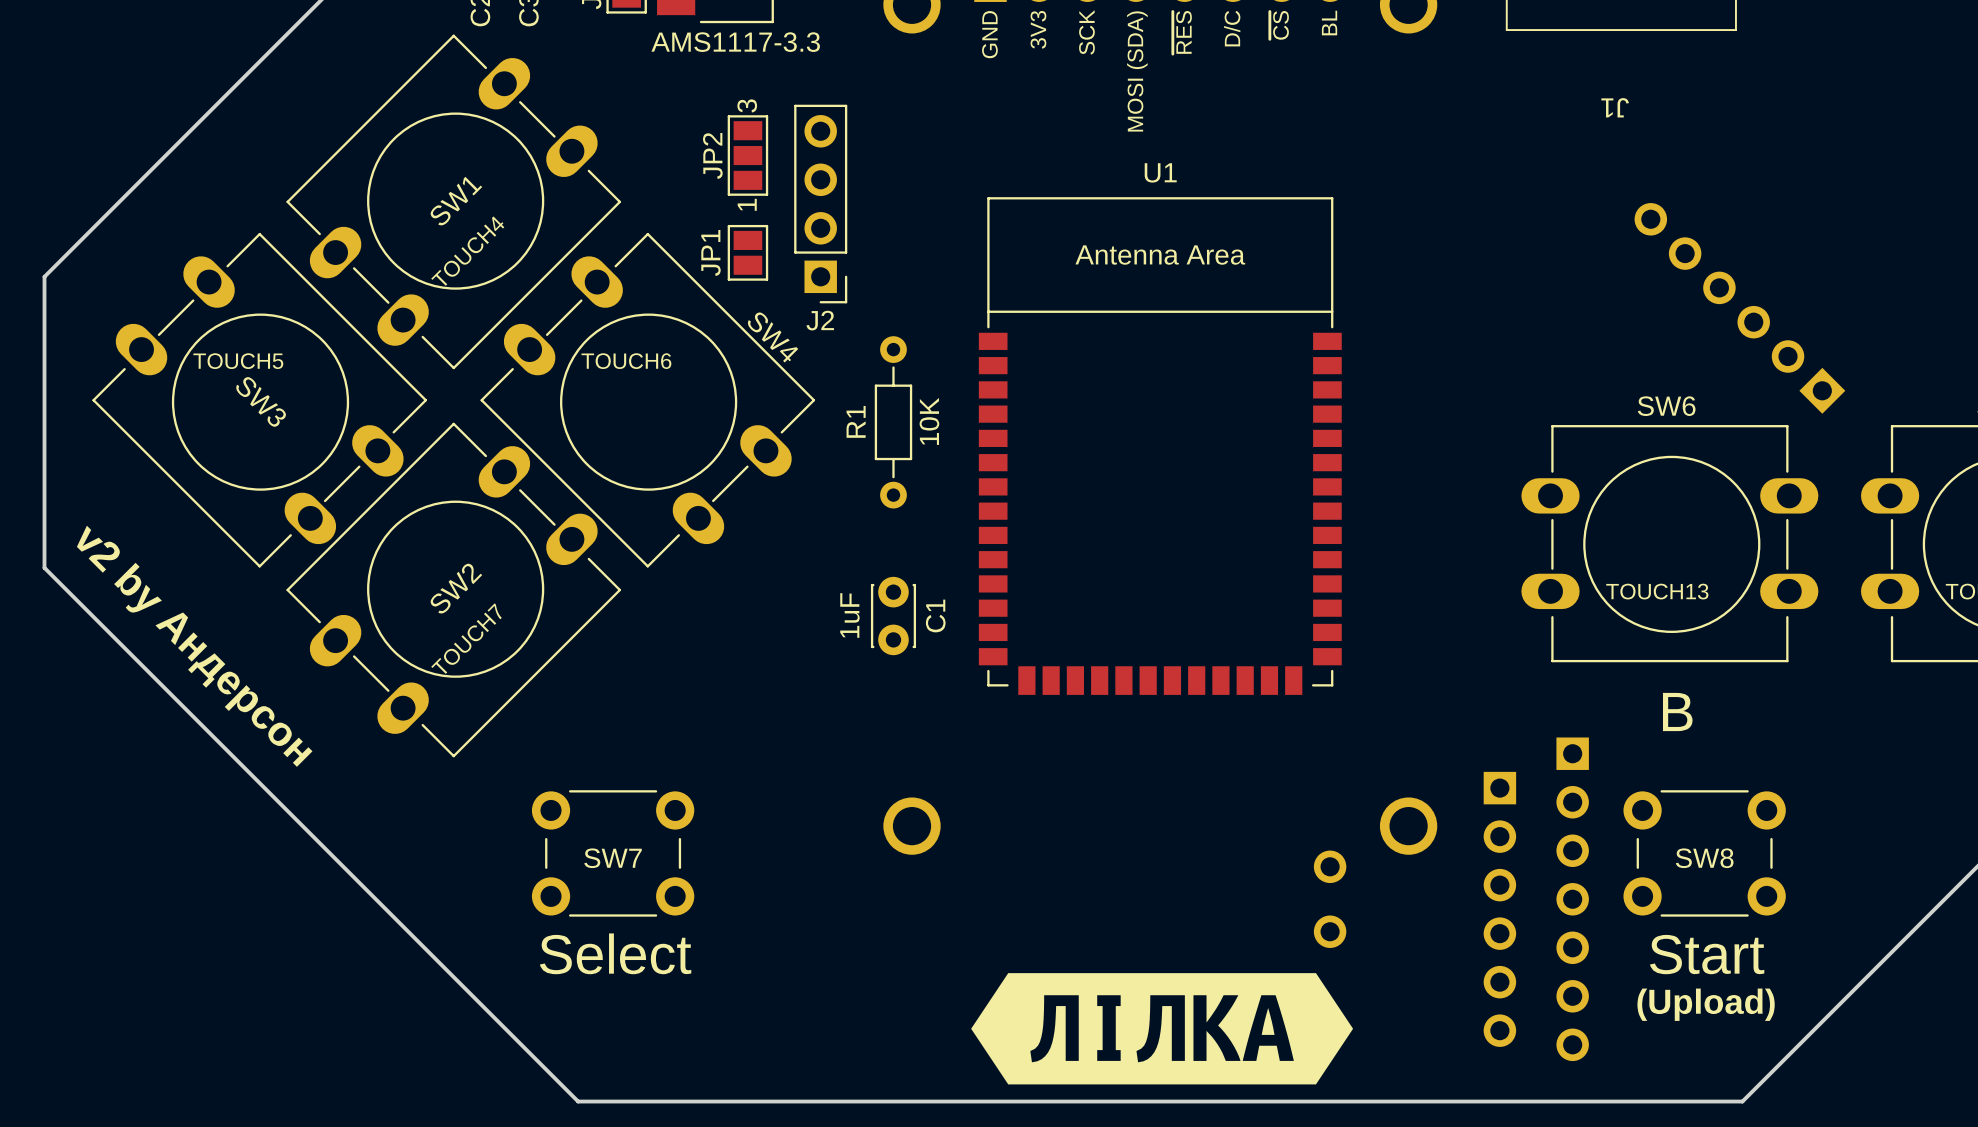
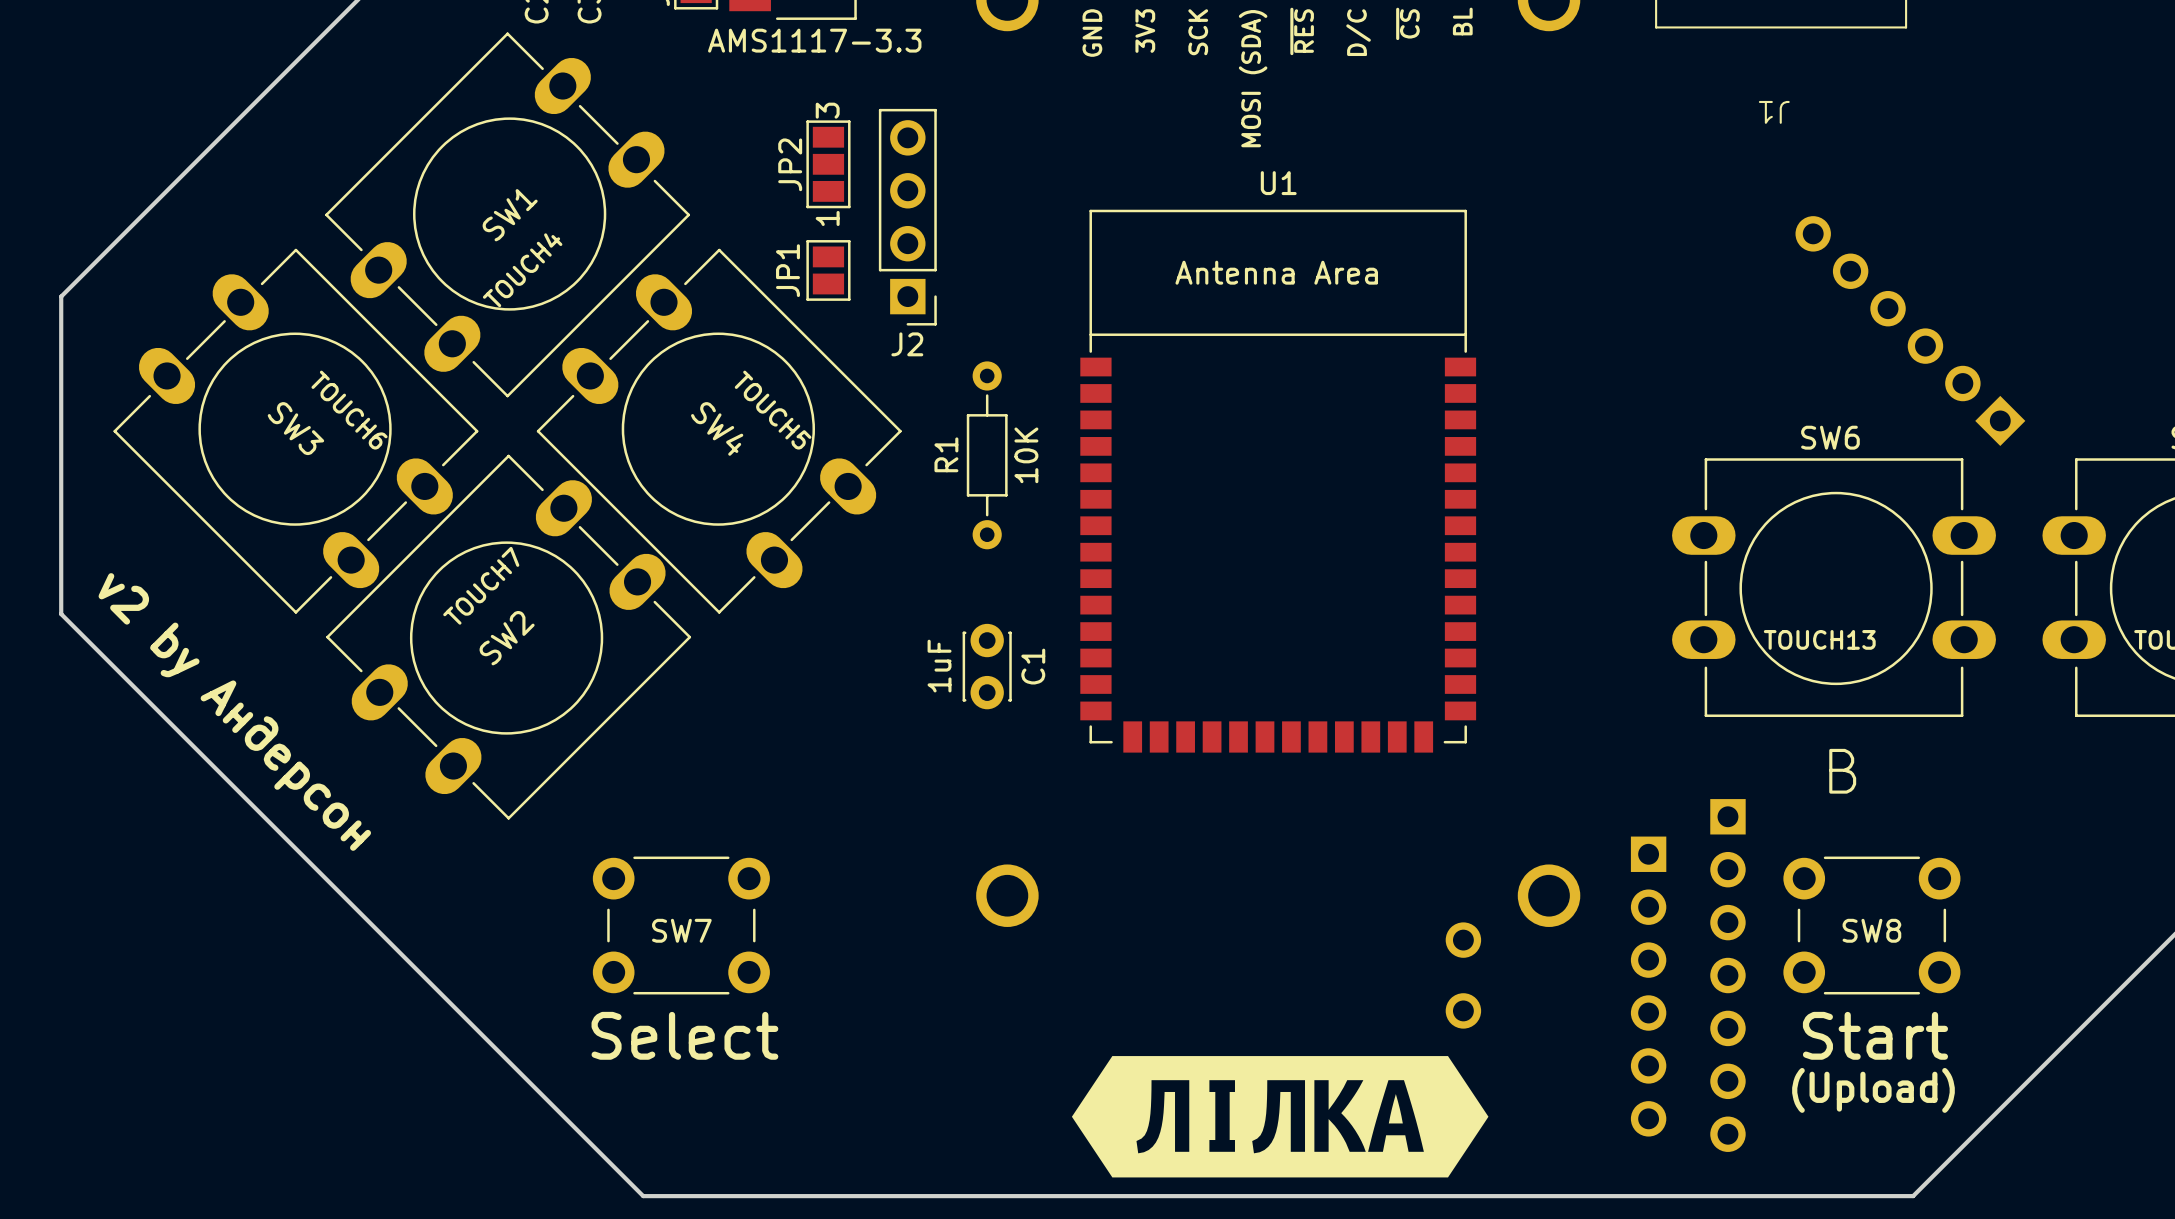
SW4 name position: SW4 (772, 337) -> SW4 (717, 428)
text rotation: 0° (238, 361) -> 45° clockwise (773, 410)
text position: TOUCH5 (238, 361) -> TOUCH5 (773, 410)
text rotation: 0° (626, 361) -> 45° clockwise (349, 410)
text position: TOUCH6 (626, 361) -> TOUCH6 (349, 410)
SW3 rotation: 0° (259, 400) -> 180° (295, 431)
SW4 rotation: 0° (647, 400) -> 180° (719, 431)
SW2 rotation: 0° (453, 590) -> 180° (508, 637)
text position: TOUCH7 (466, 638) -> TOUCH7 (481, 585)

